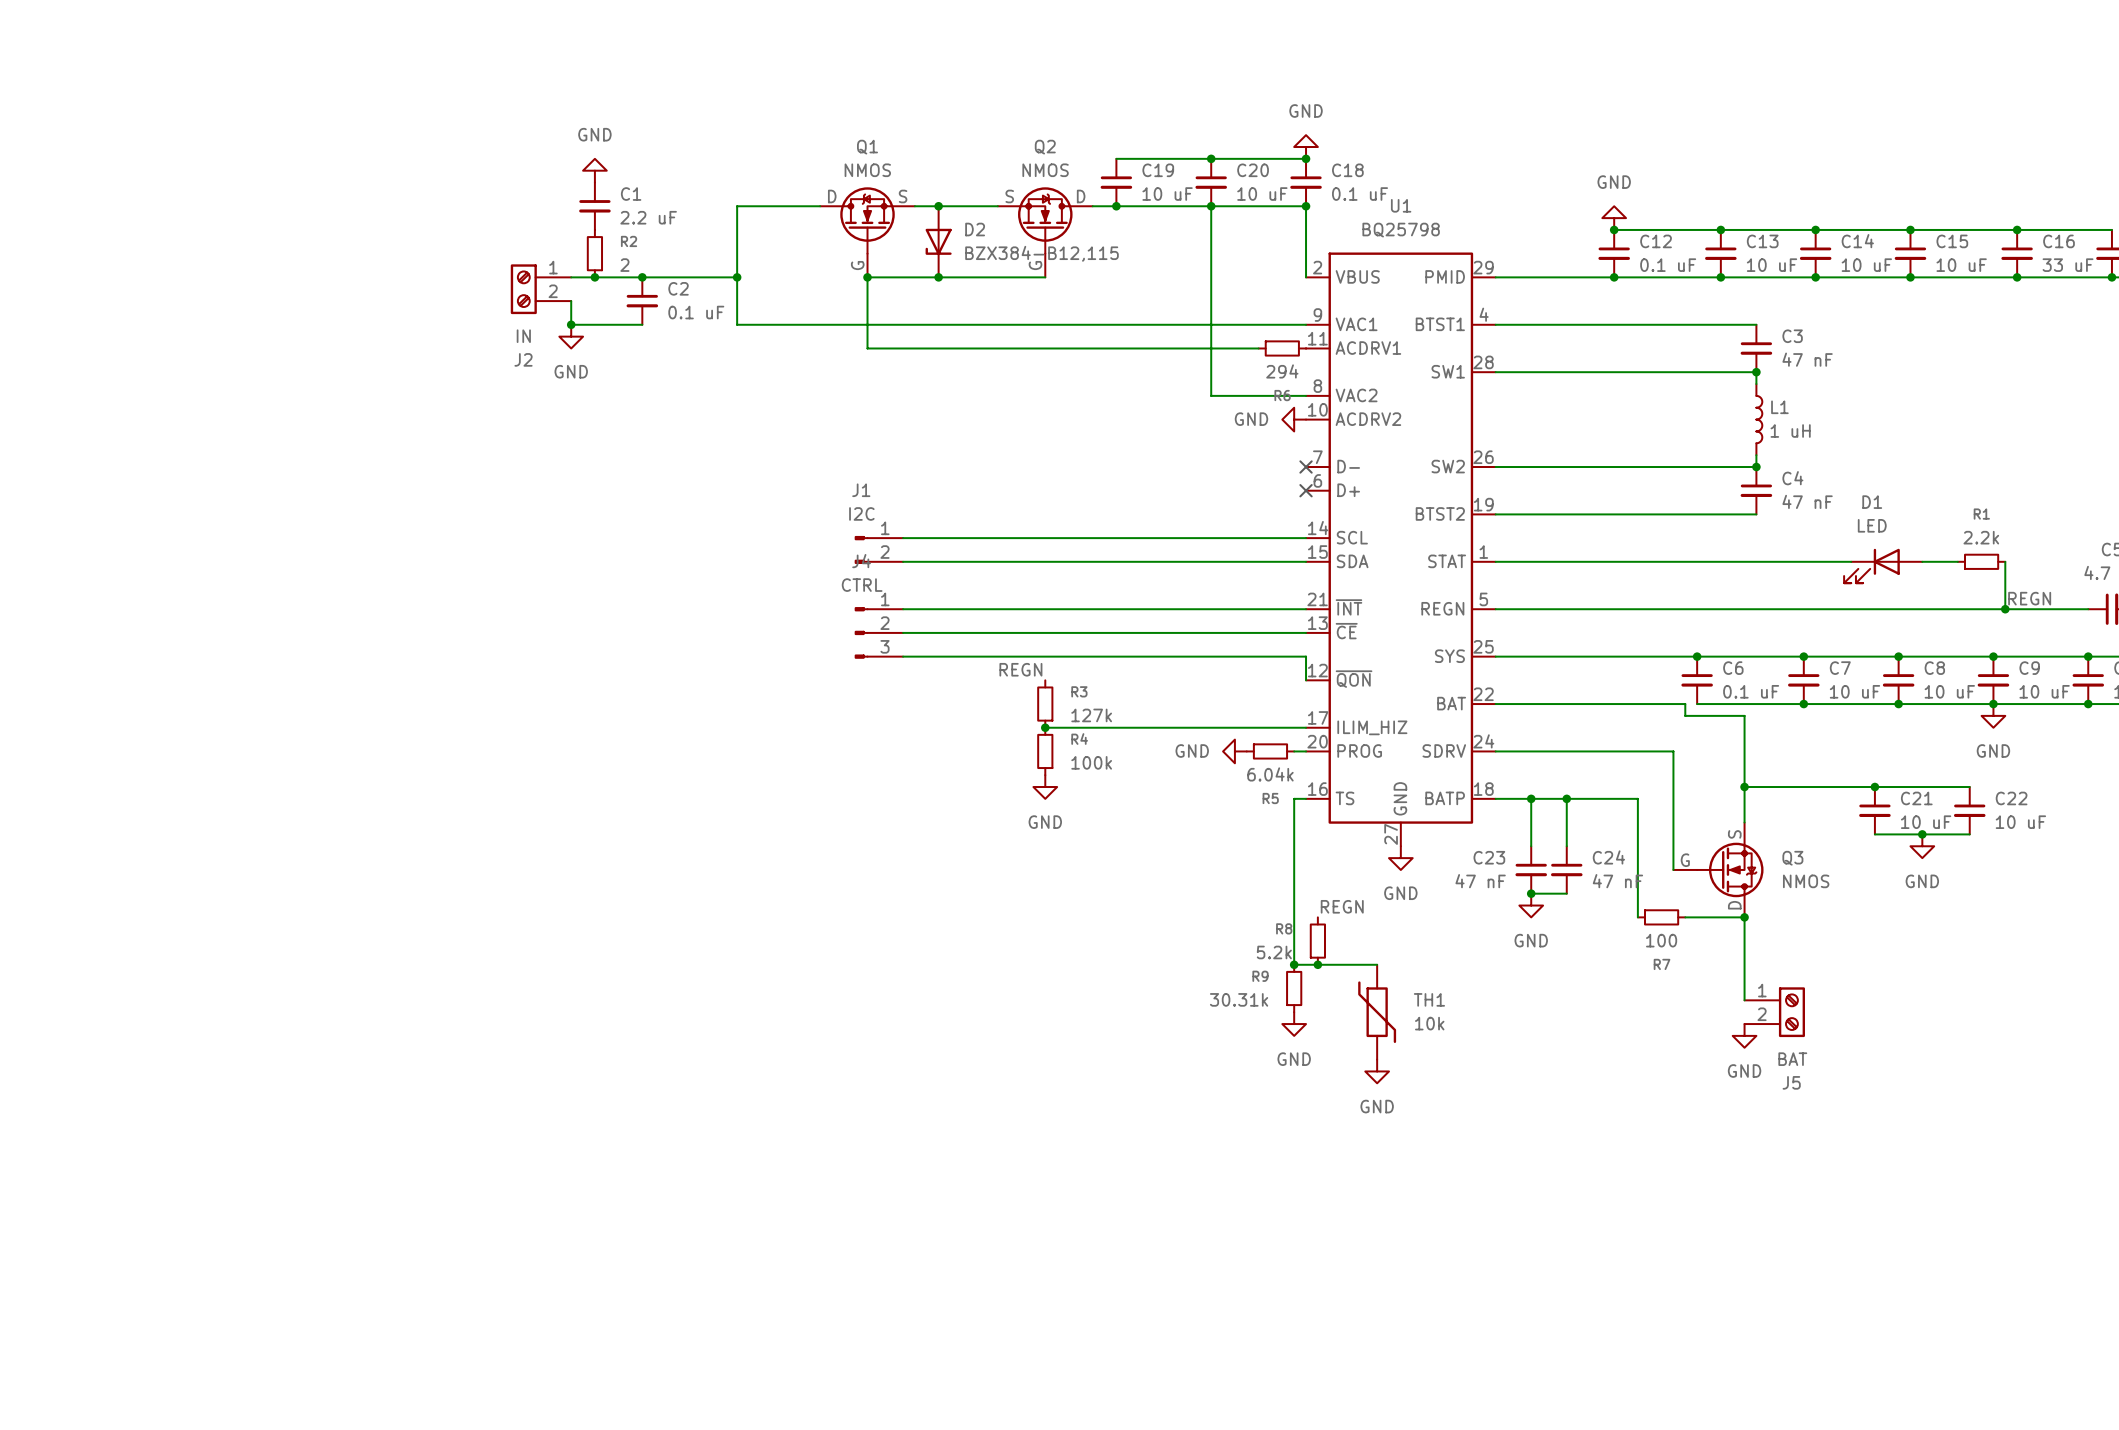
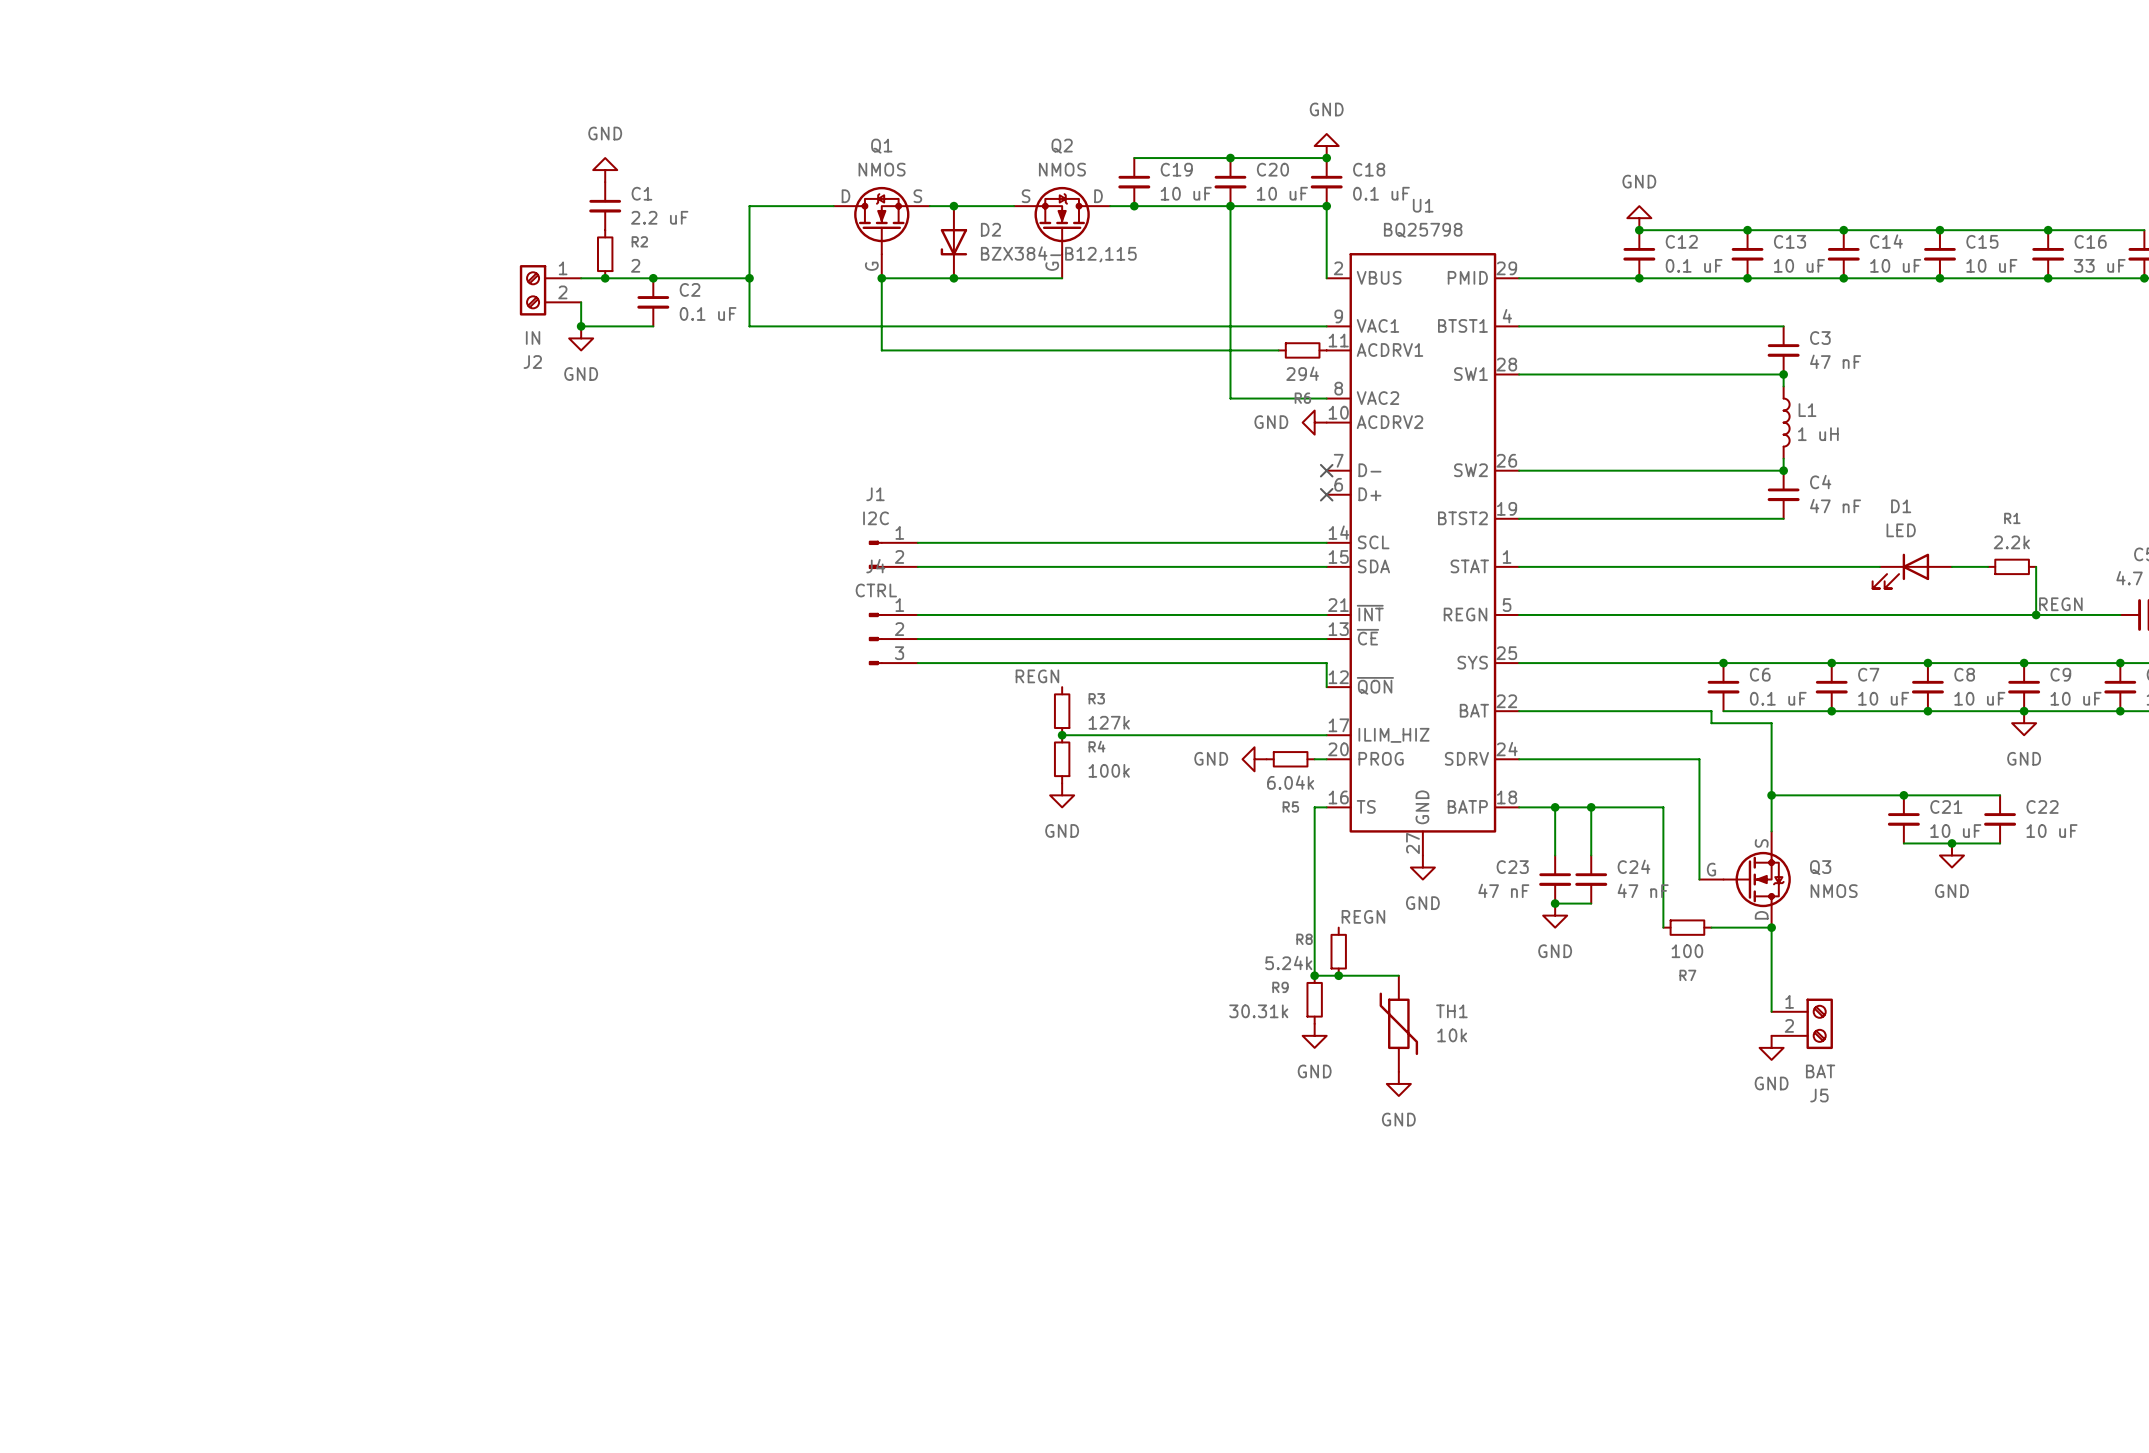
R8 value: 5.2k (1274, 952) -> 5.24k (1288, 962)

